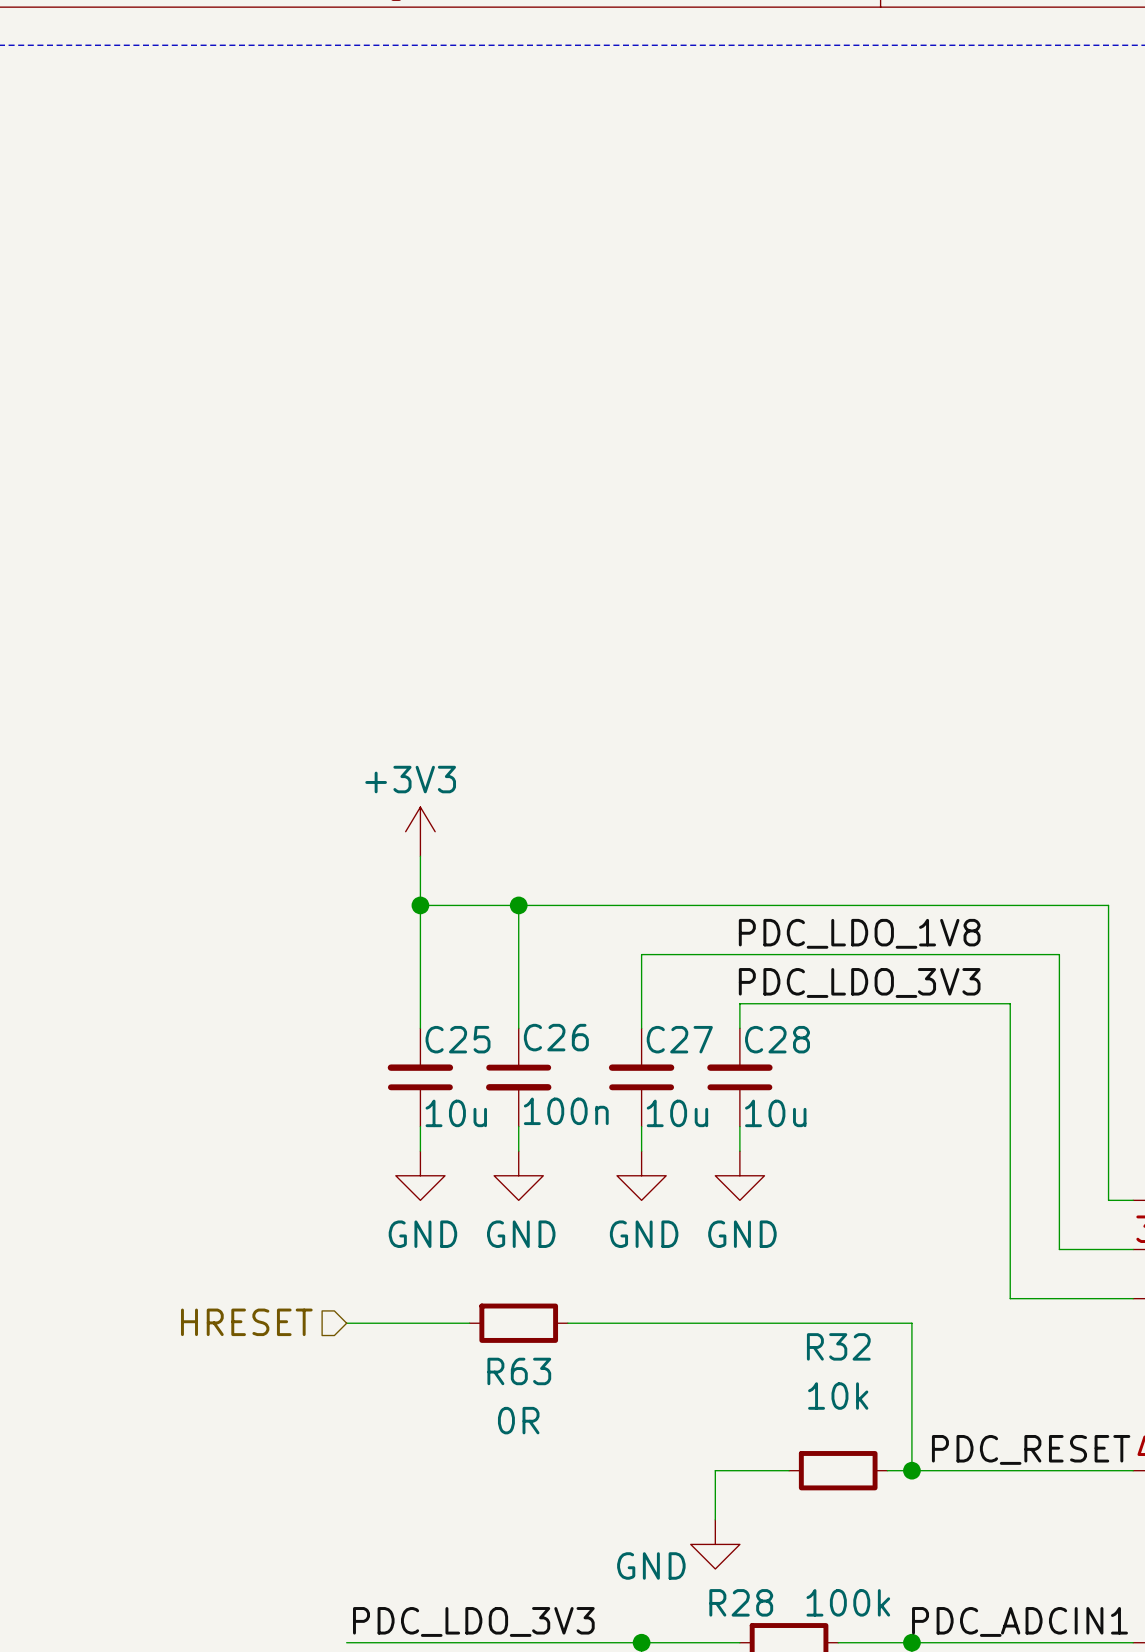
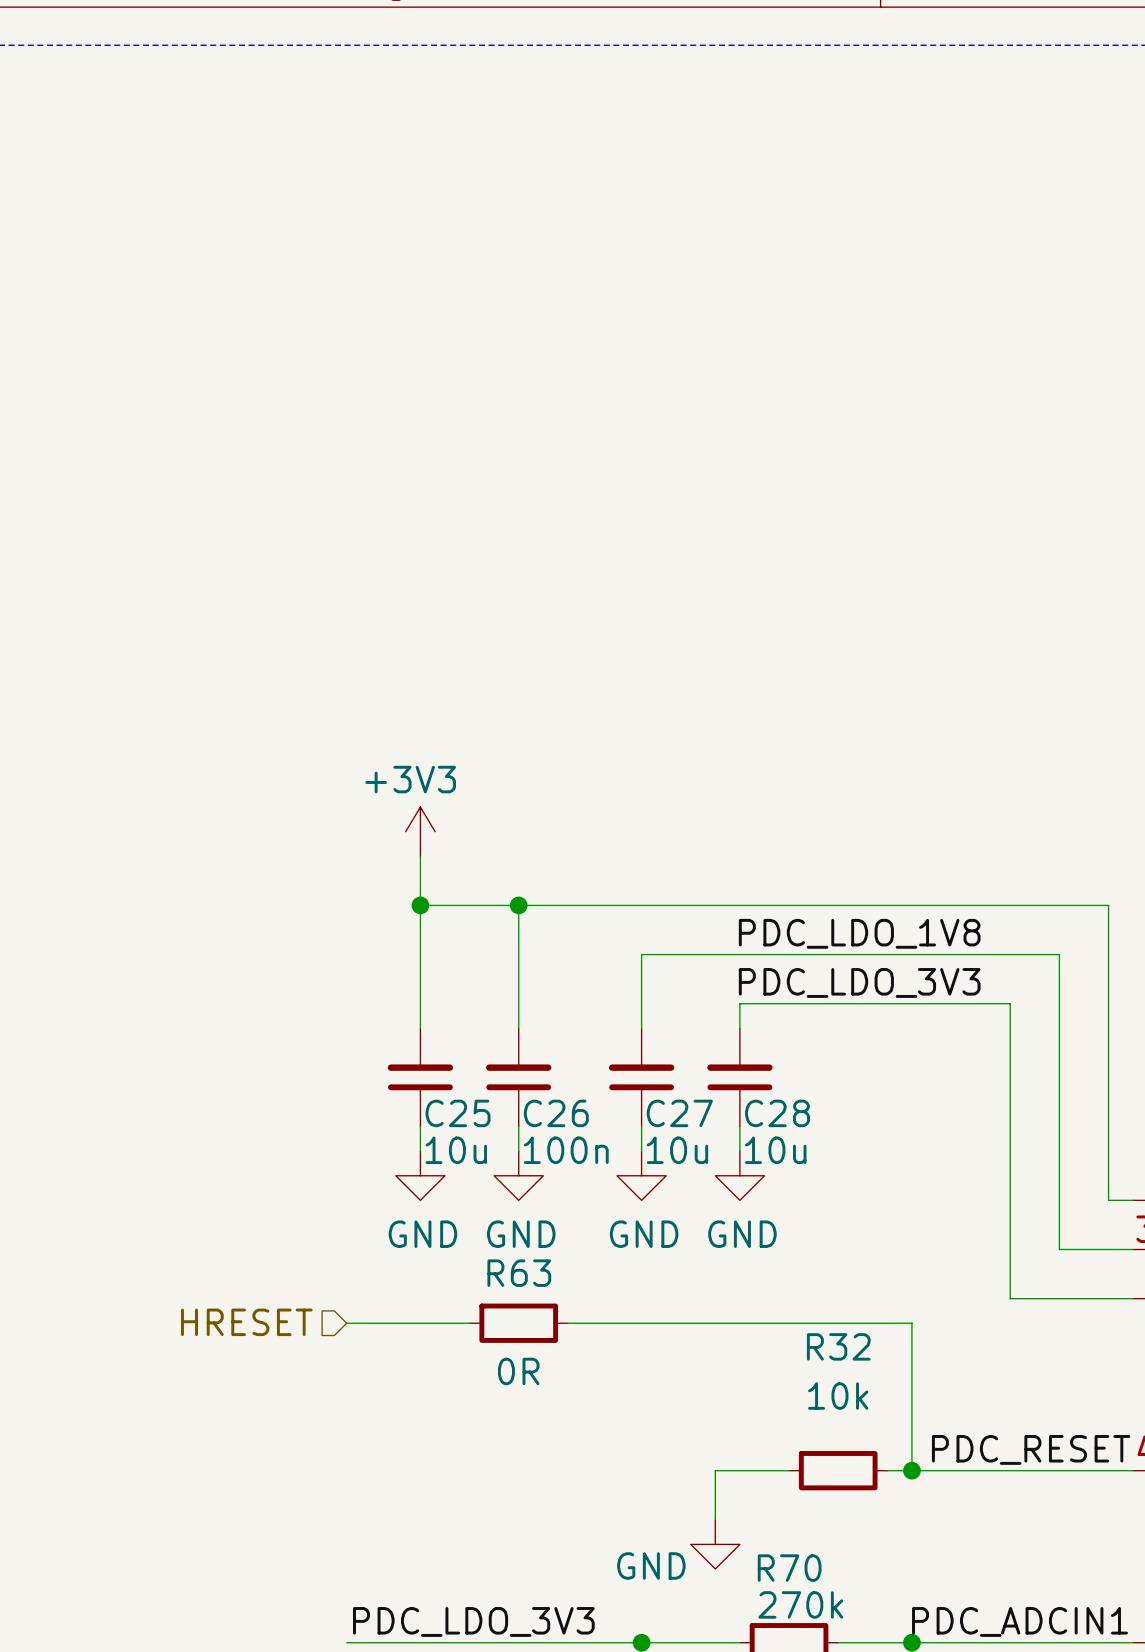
C26 name position: C26 (556, 1037) -> C26 (556, 1113)
C25 name position: C25 (458, 1039) -> C25 (458, 1113)
C27 name position: C27 (679, 1039) -> C27 (679, 1113)
C28 name position: C28 (777, 1039) -> C28 (777, 1113)
C26 rotation: 0° (518, 1077) -> 180° (518, 1077)
C26 text position: 100n (566, 1111) -> 100n (566, 1150)
C25 text position: 10u (456, 1113) -> 10u (456, 1150)
C27 text position: 10u (677, 1113) -> 10u (677, 1150)
C28 text position: 10u (775, 1113) -> 10u (775, 1150)
R63 name position: R63 (519, 1371) -> R63 (519, 1273)
R63 text position: 0R (518, 1420) -> 0R (518, 1371)
R28 name: R28 (741, 1602) -> R70 (789, 1568)
R28 text: 100k (848, 1602) -> 270k (800, 1604)

